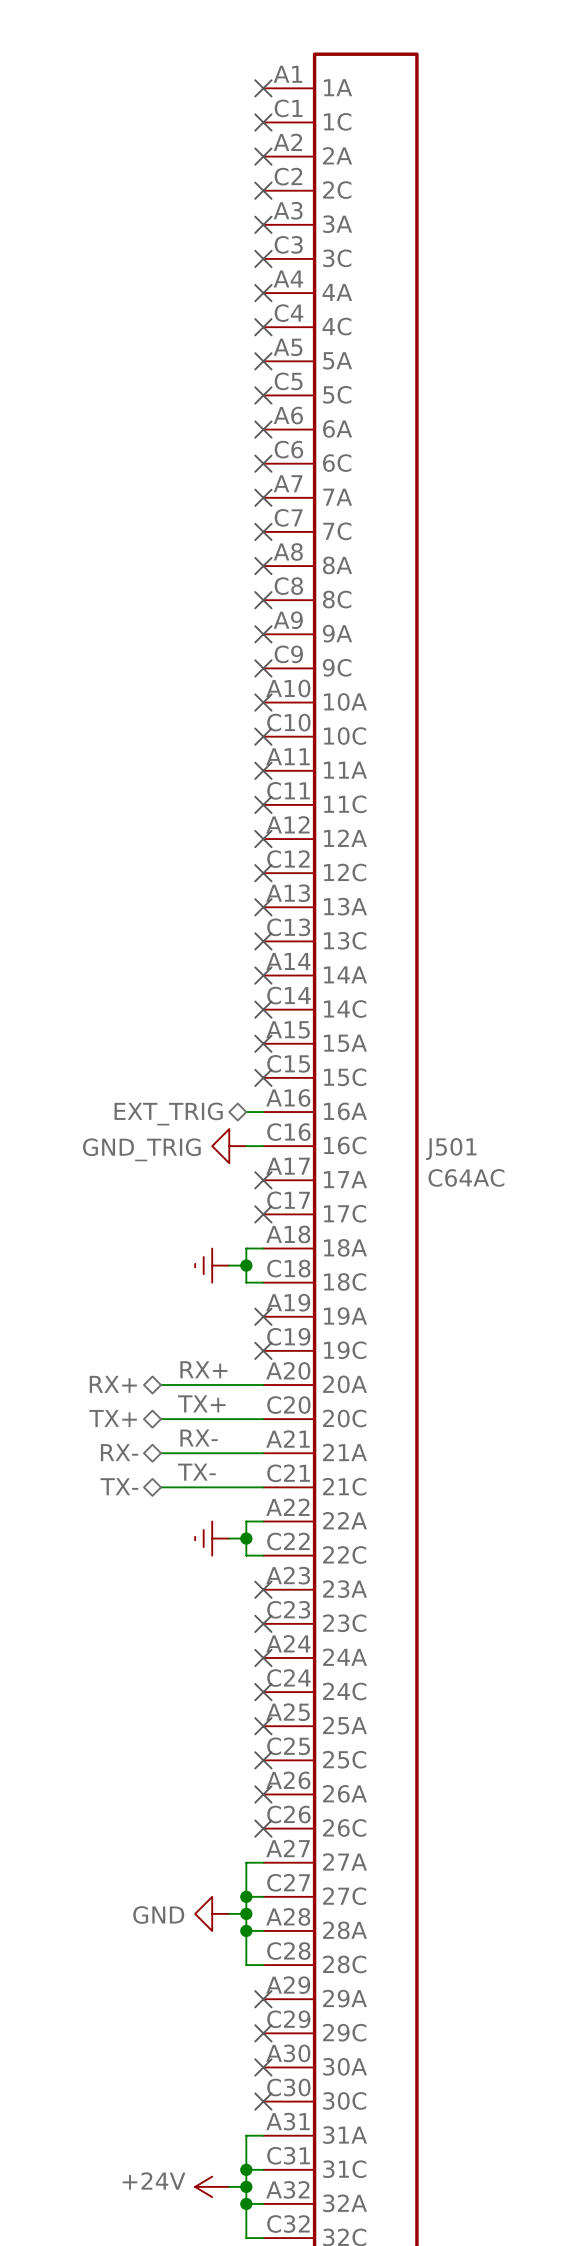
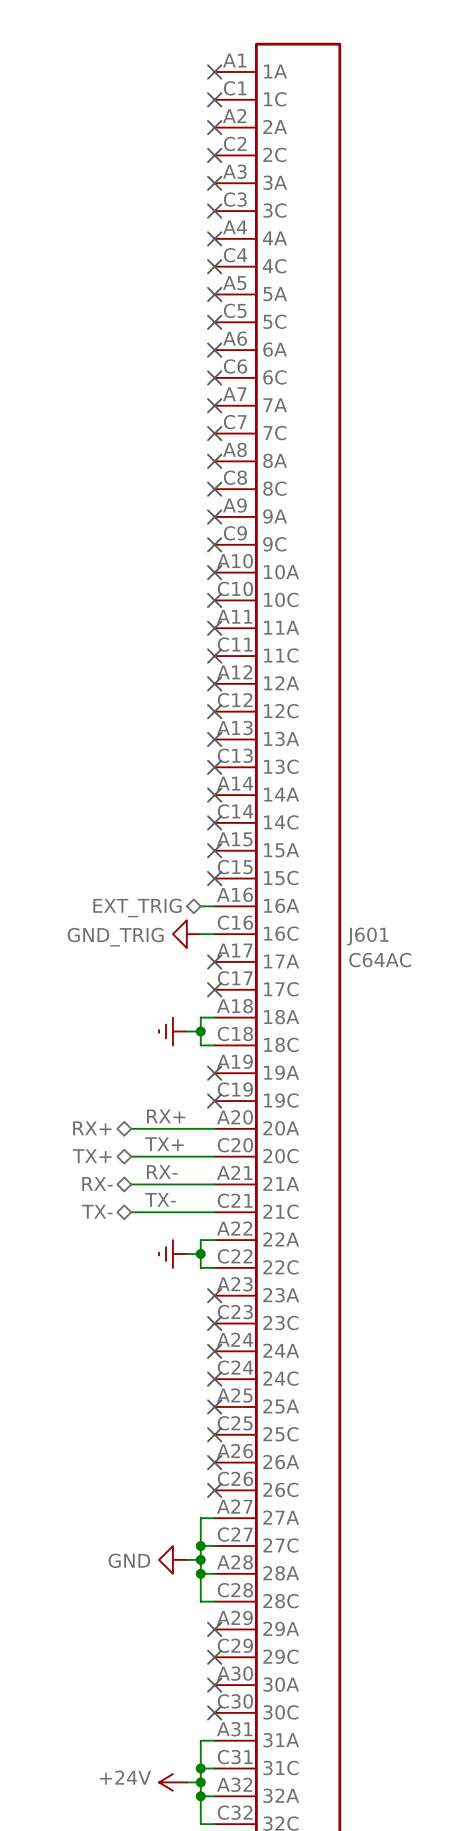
J501 name: J501 (451, 1149) -> J601 (367, 936)

